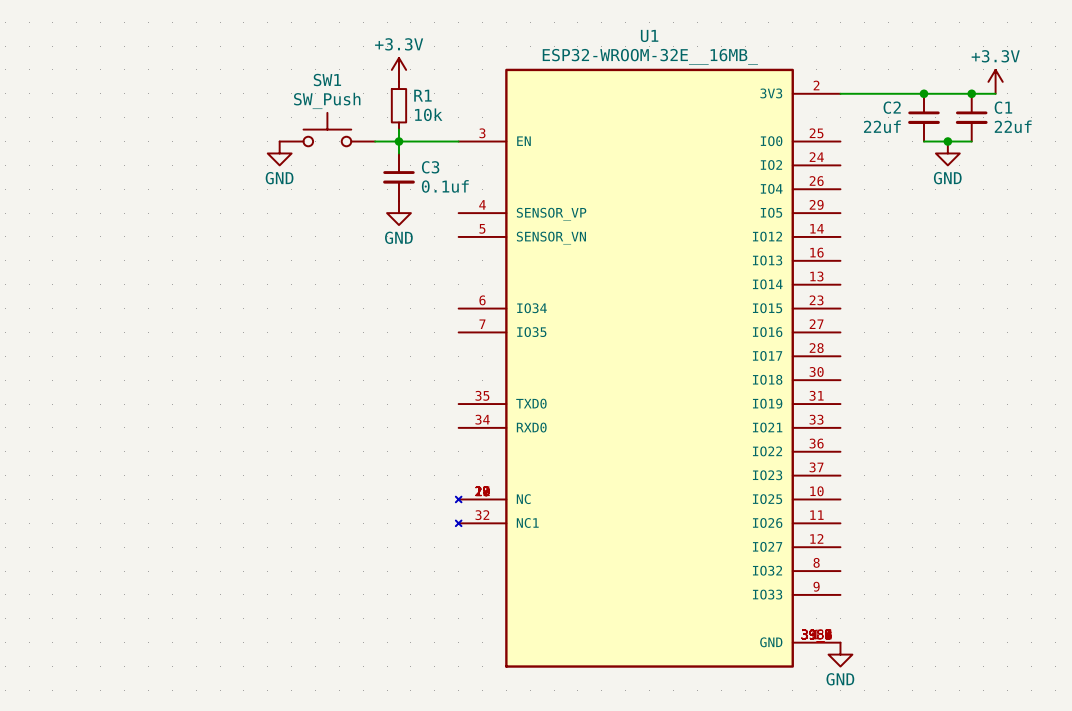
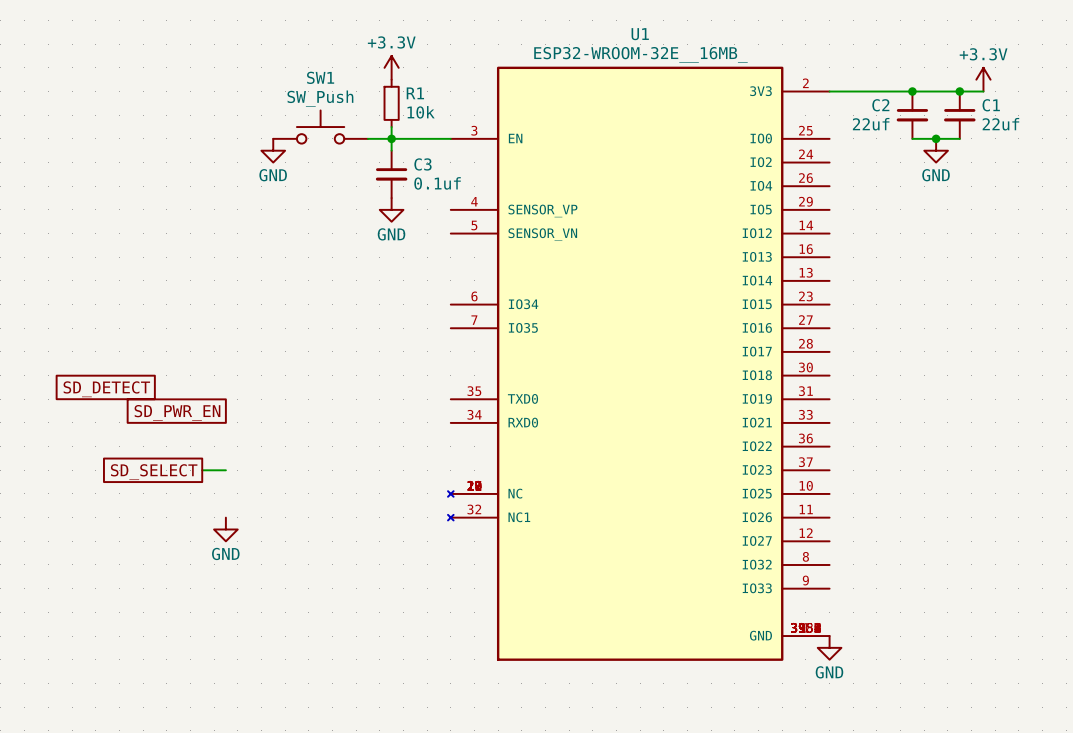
global label: none -> SD_DETECT (106, 389)
global label: none -> SD_PWR_EN (177, 412)
wire: none -> (202, 470) (225, 470)
global label: none -> SD_SELECT (154, 472)
power symbol: none -> GND (225, 529)

